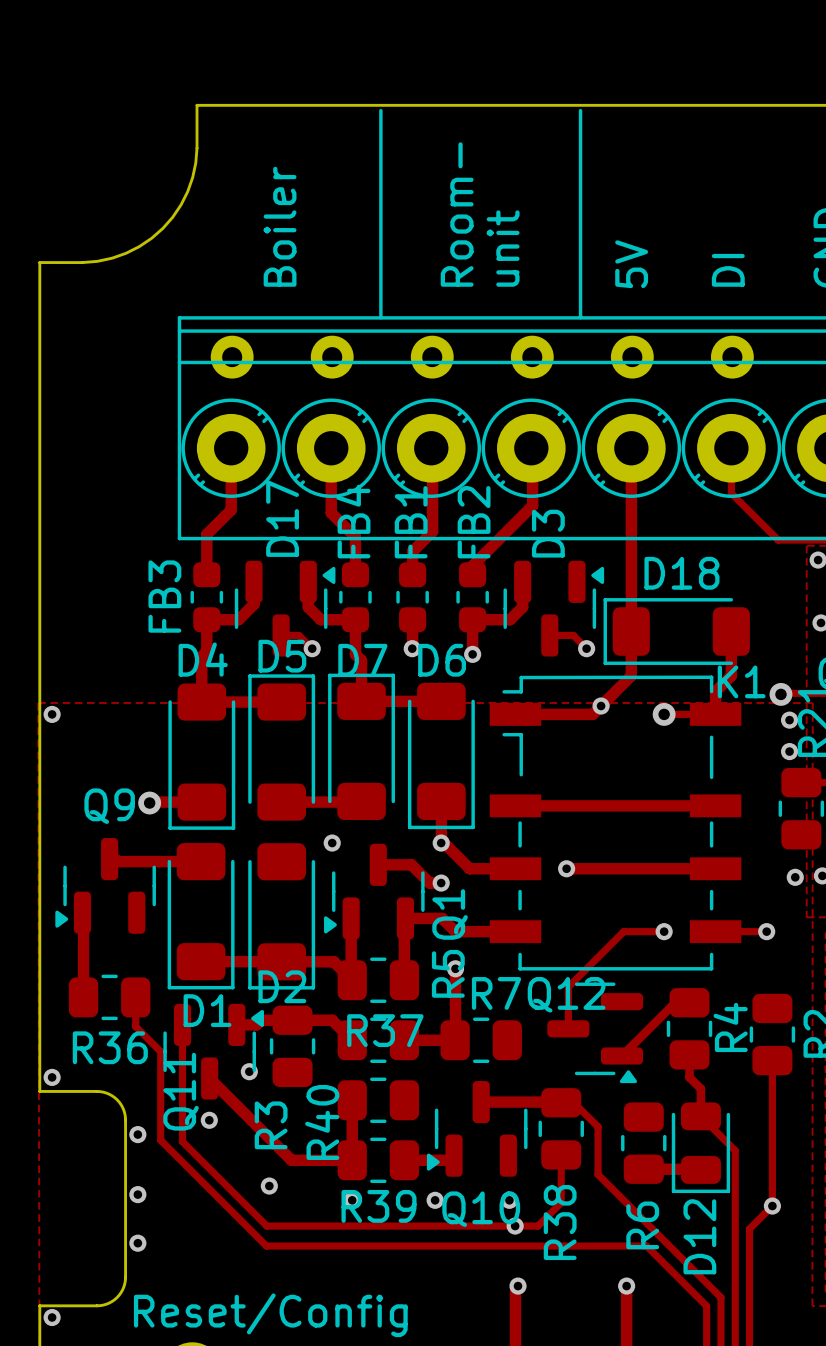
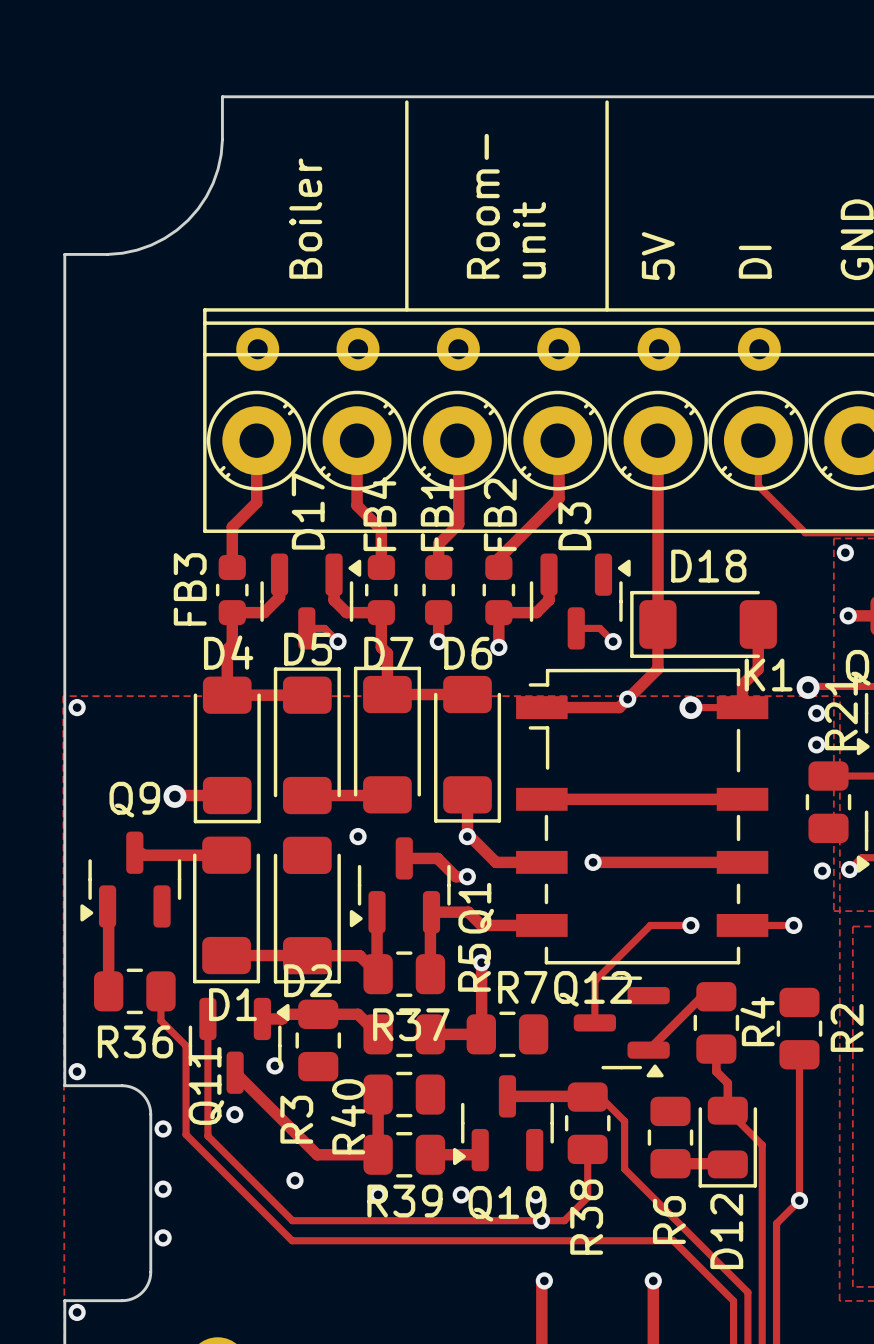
text: Reset/Config (270, 1315) -> none

